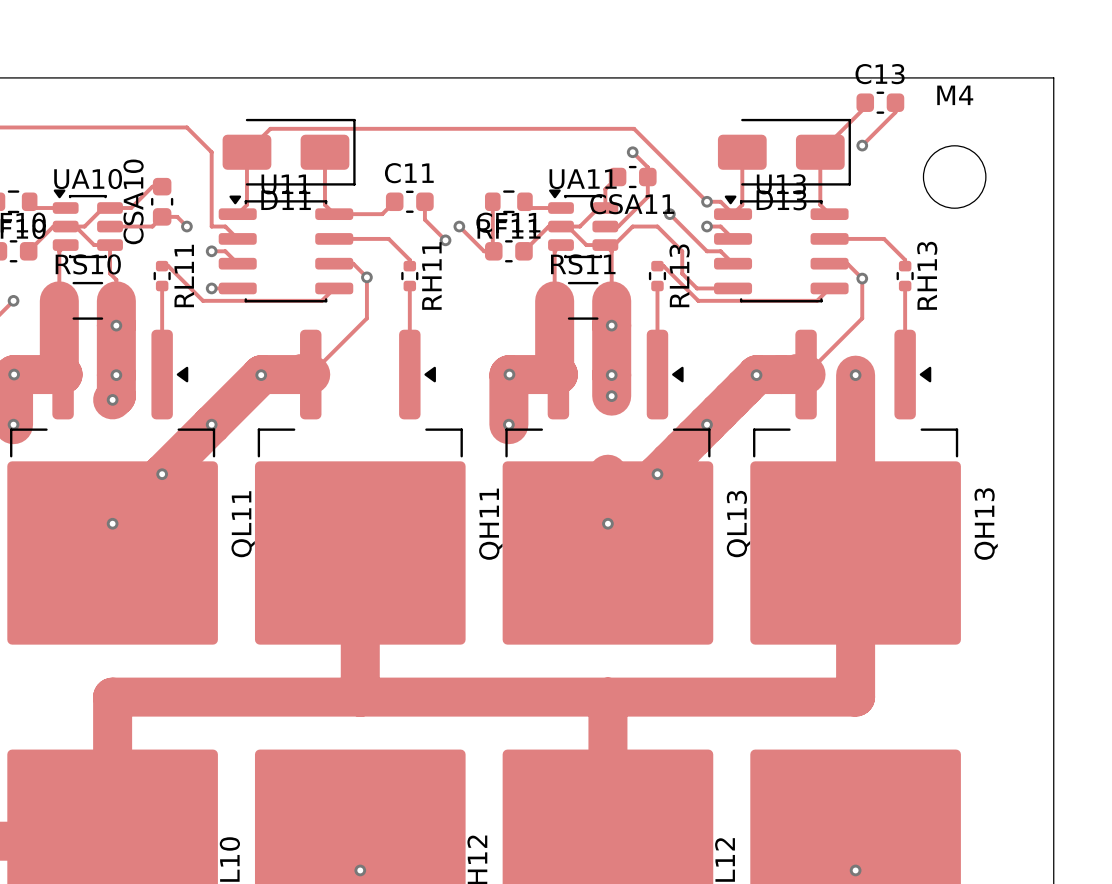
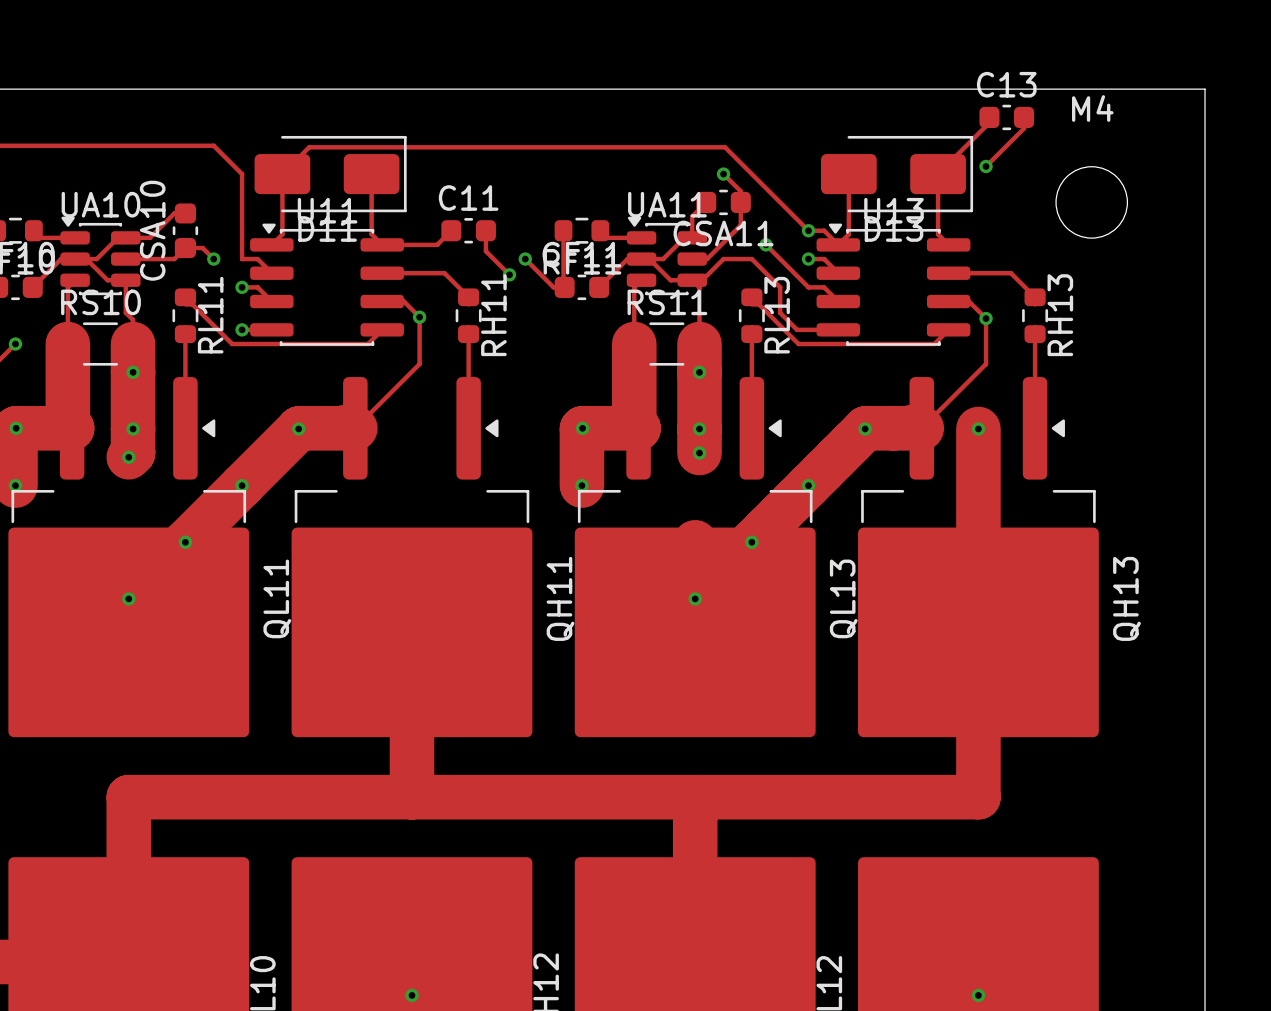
RL11 footprint: [153, 260, 171, 292] -> [172, 288, 199, 344]
RH11 footprint: [401, 260, 419, 292] -> [455, 288, 482, 344]
RL13 footprint: [648, 260, 667, 292] -> [738, 288, 765, 344]
RH13 footprint: [896, 260, 914, 292] -> [1022, 288, 1049, 344]

